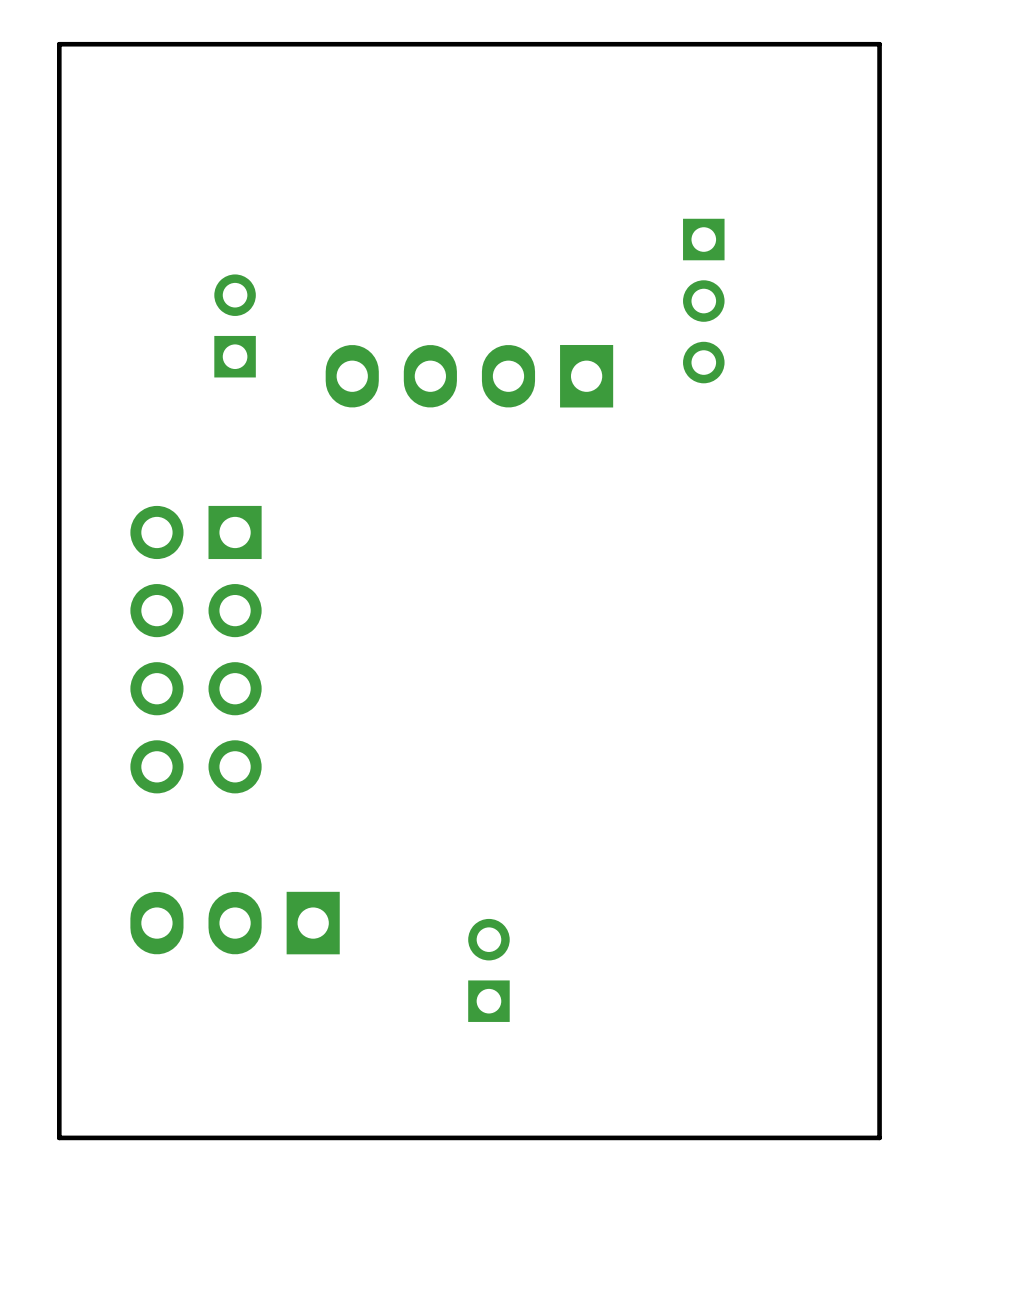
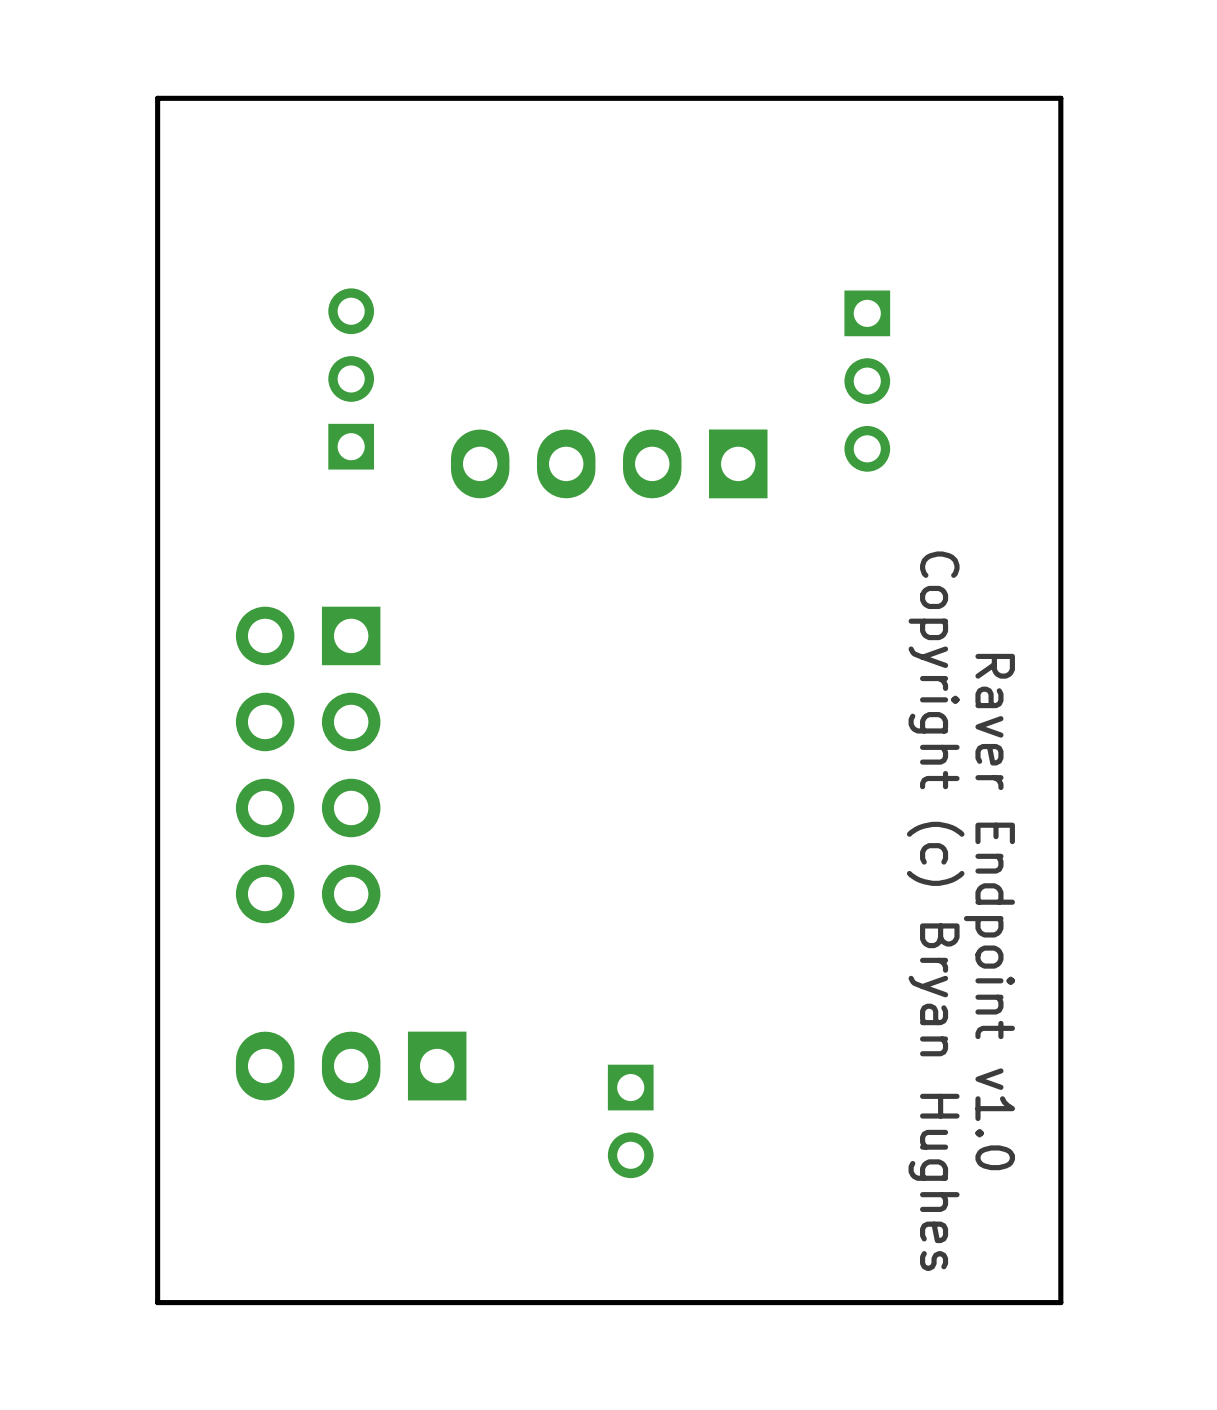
part footprint: [214, 274, 256, 378] -> [328, 288, 375, 470]
text: none -> Copyright (c) Bryan Hughes (935, 911)
text: none -> Raver Endpoint v1.0 (989, 912)
part rotation: 0° (488, 970) -> 180° (630, 1121)

